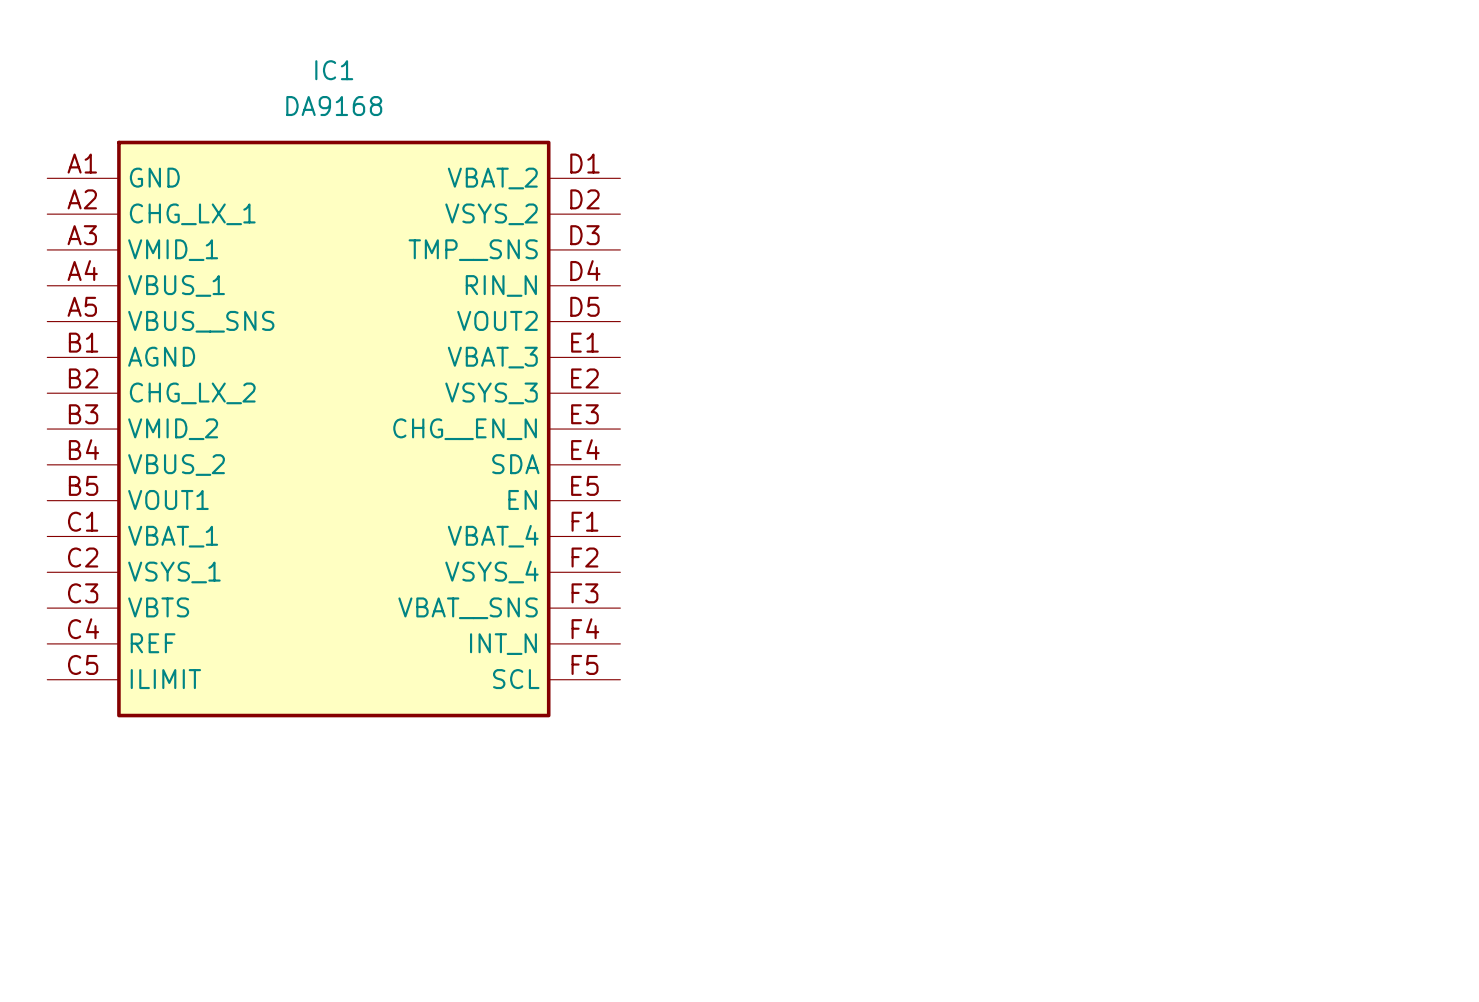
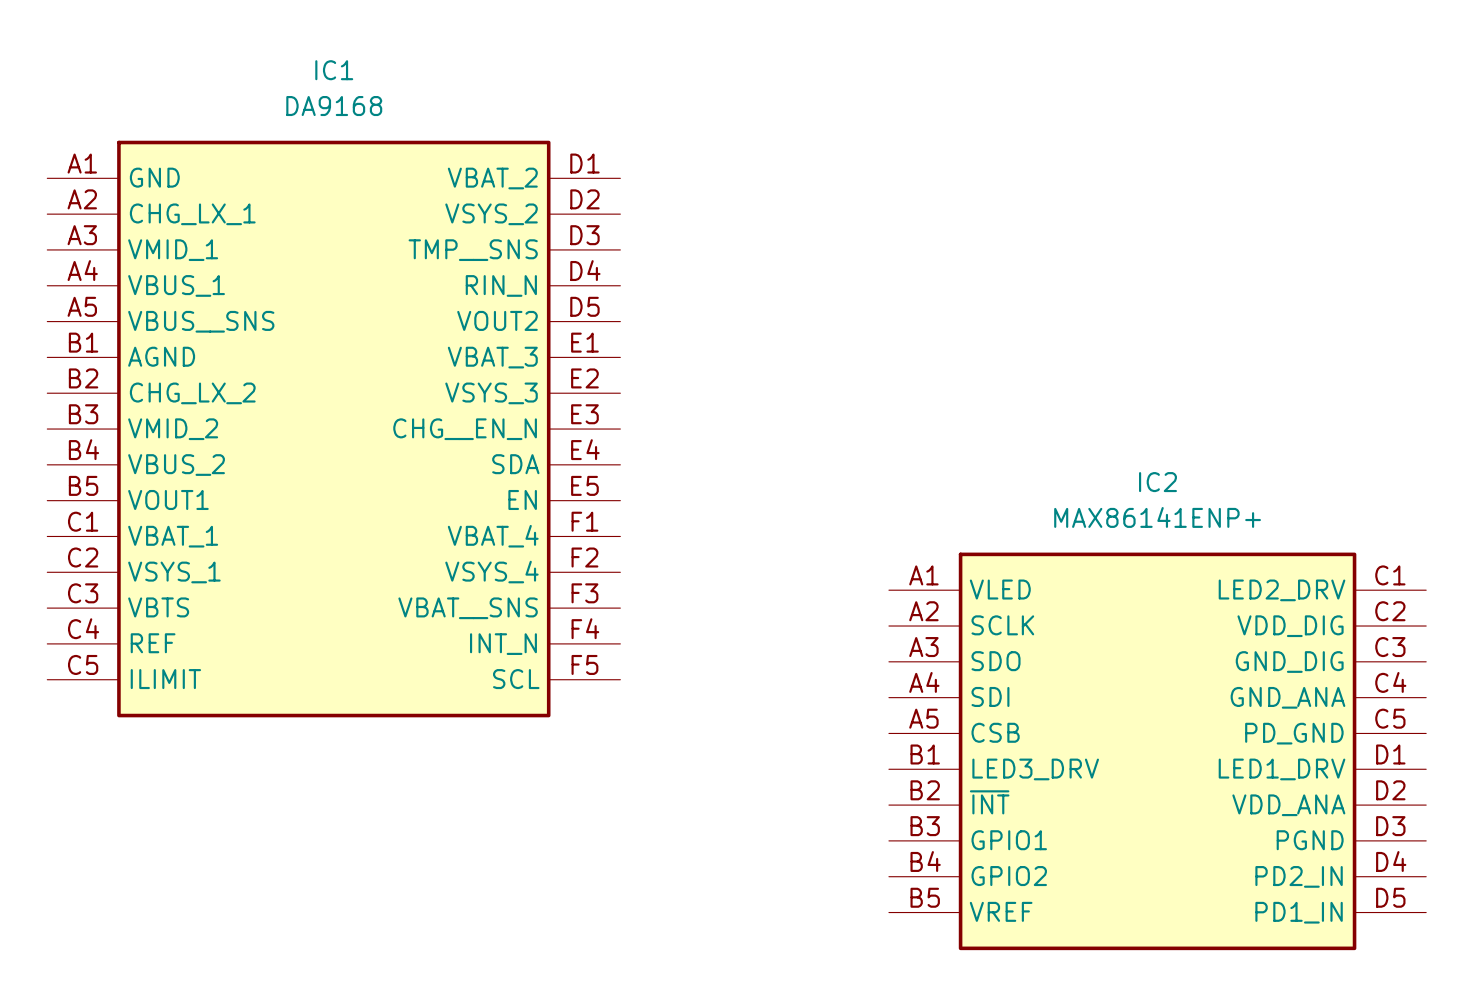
IC2: none -> MAX86141ENP+ (1157, 751)

